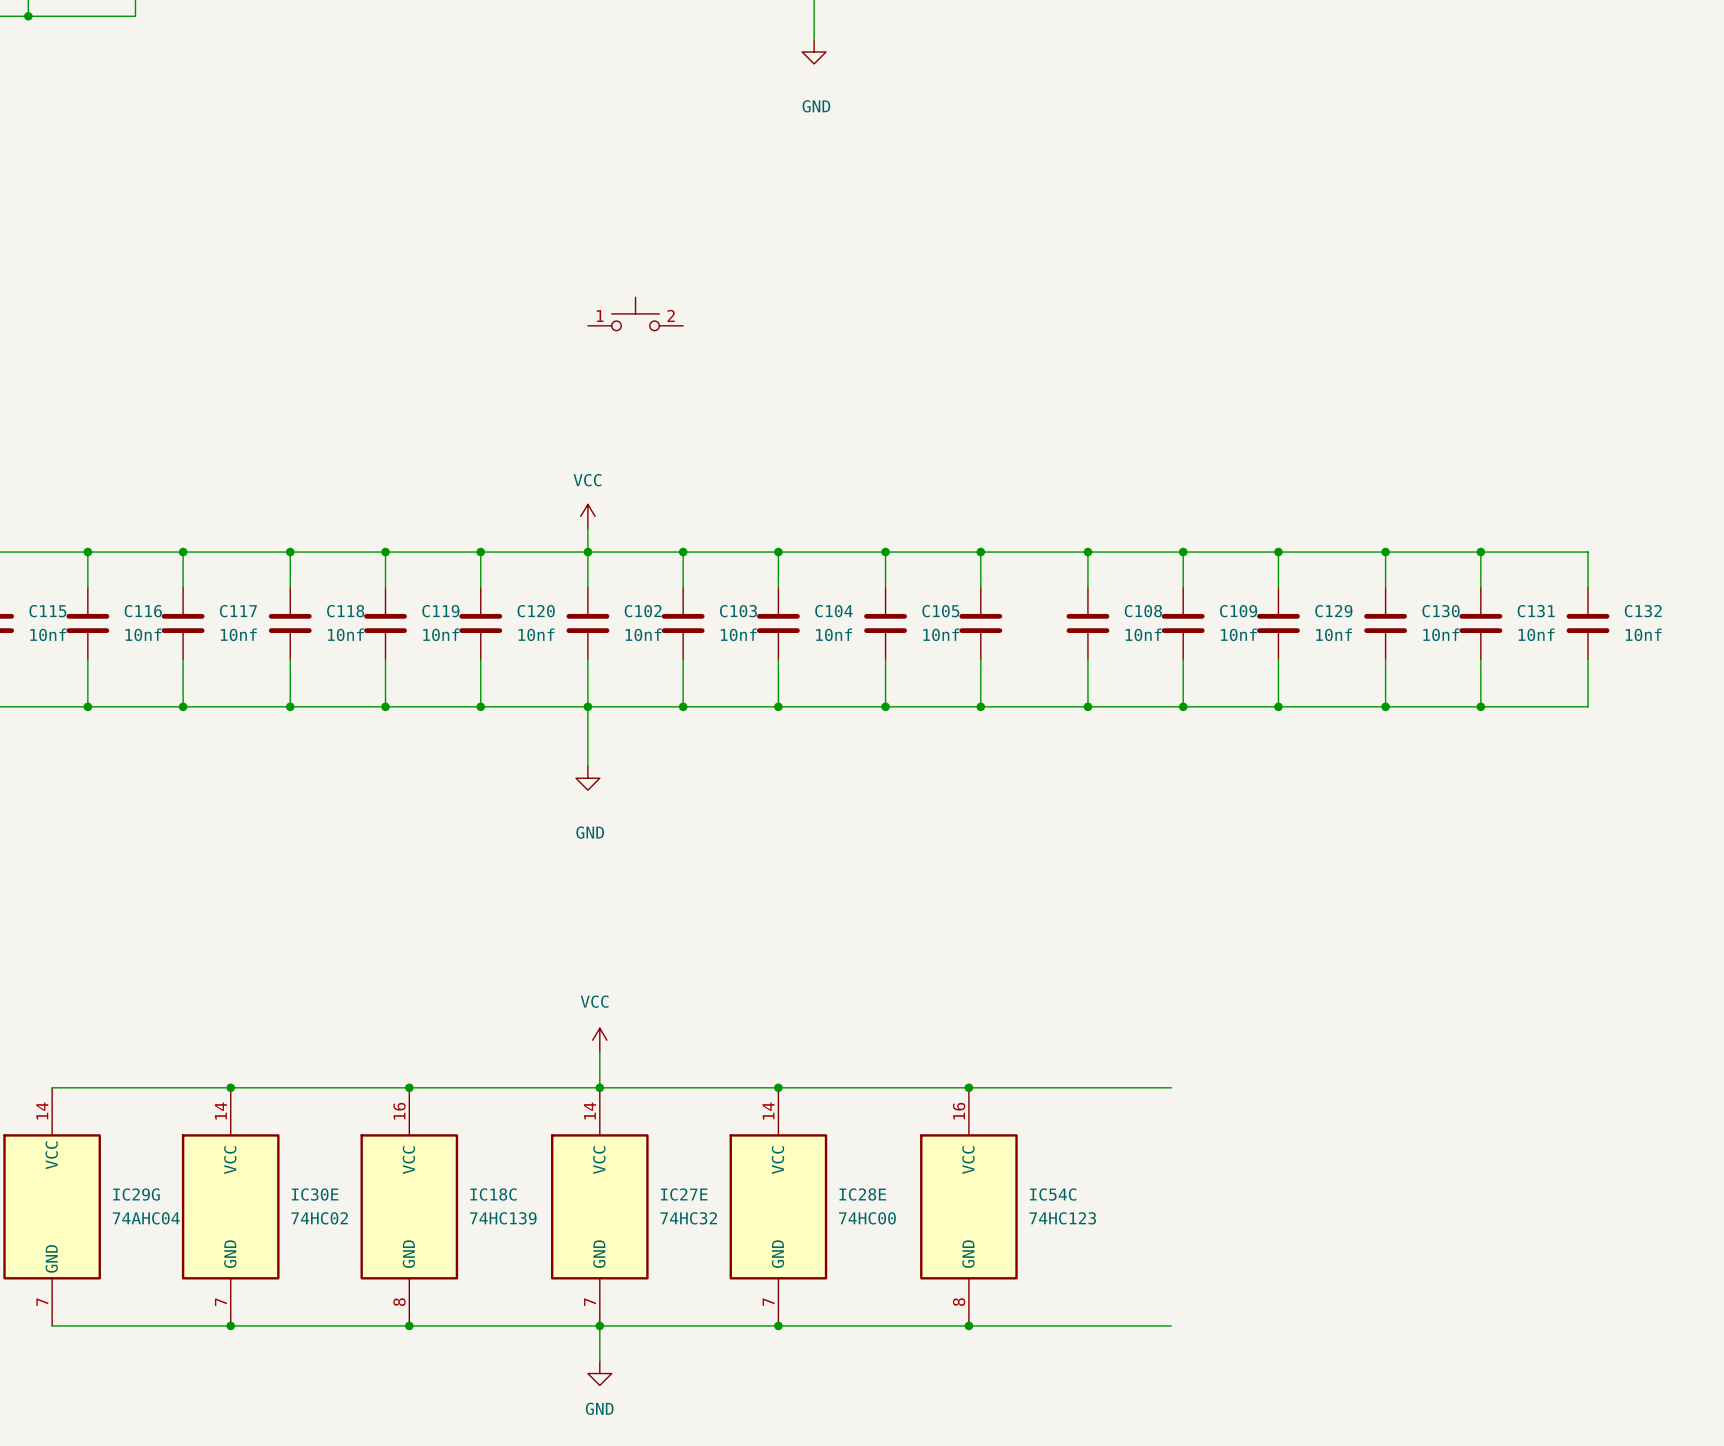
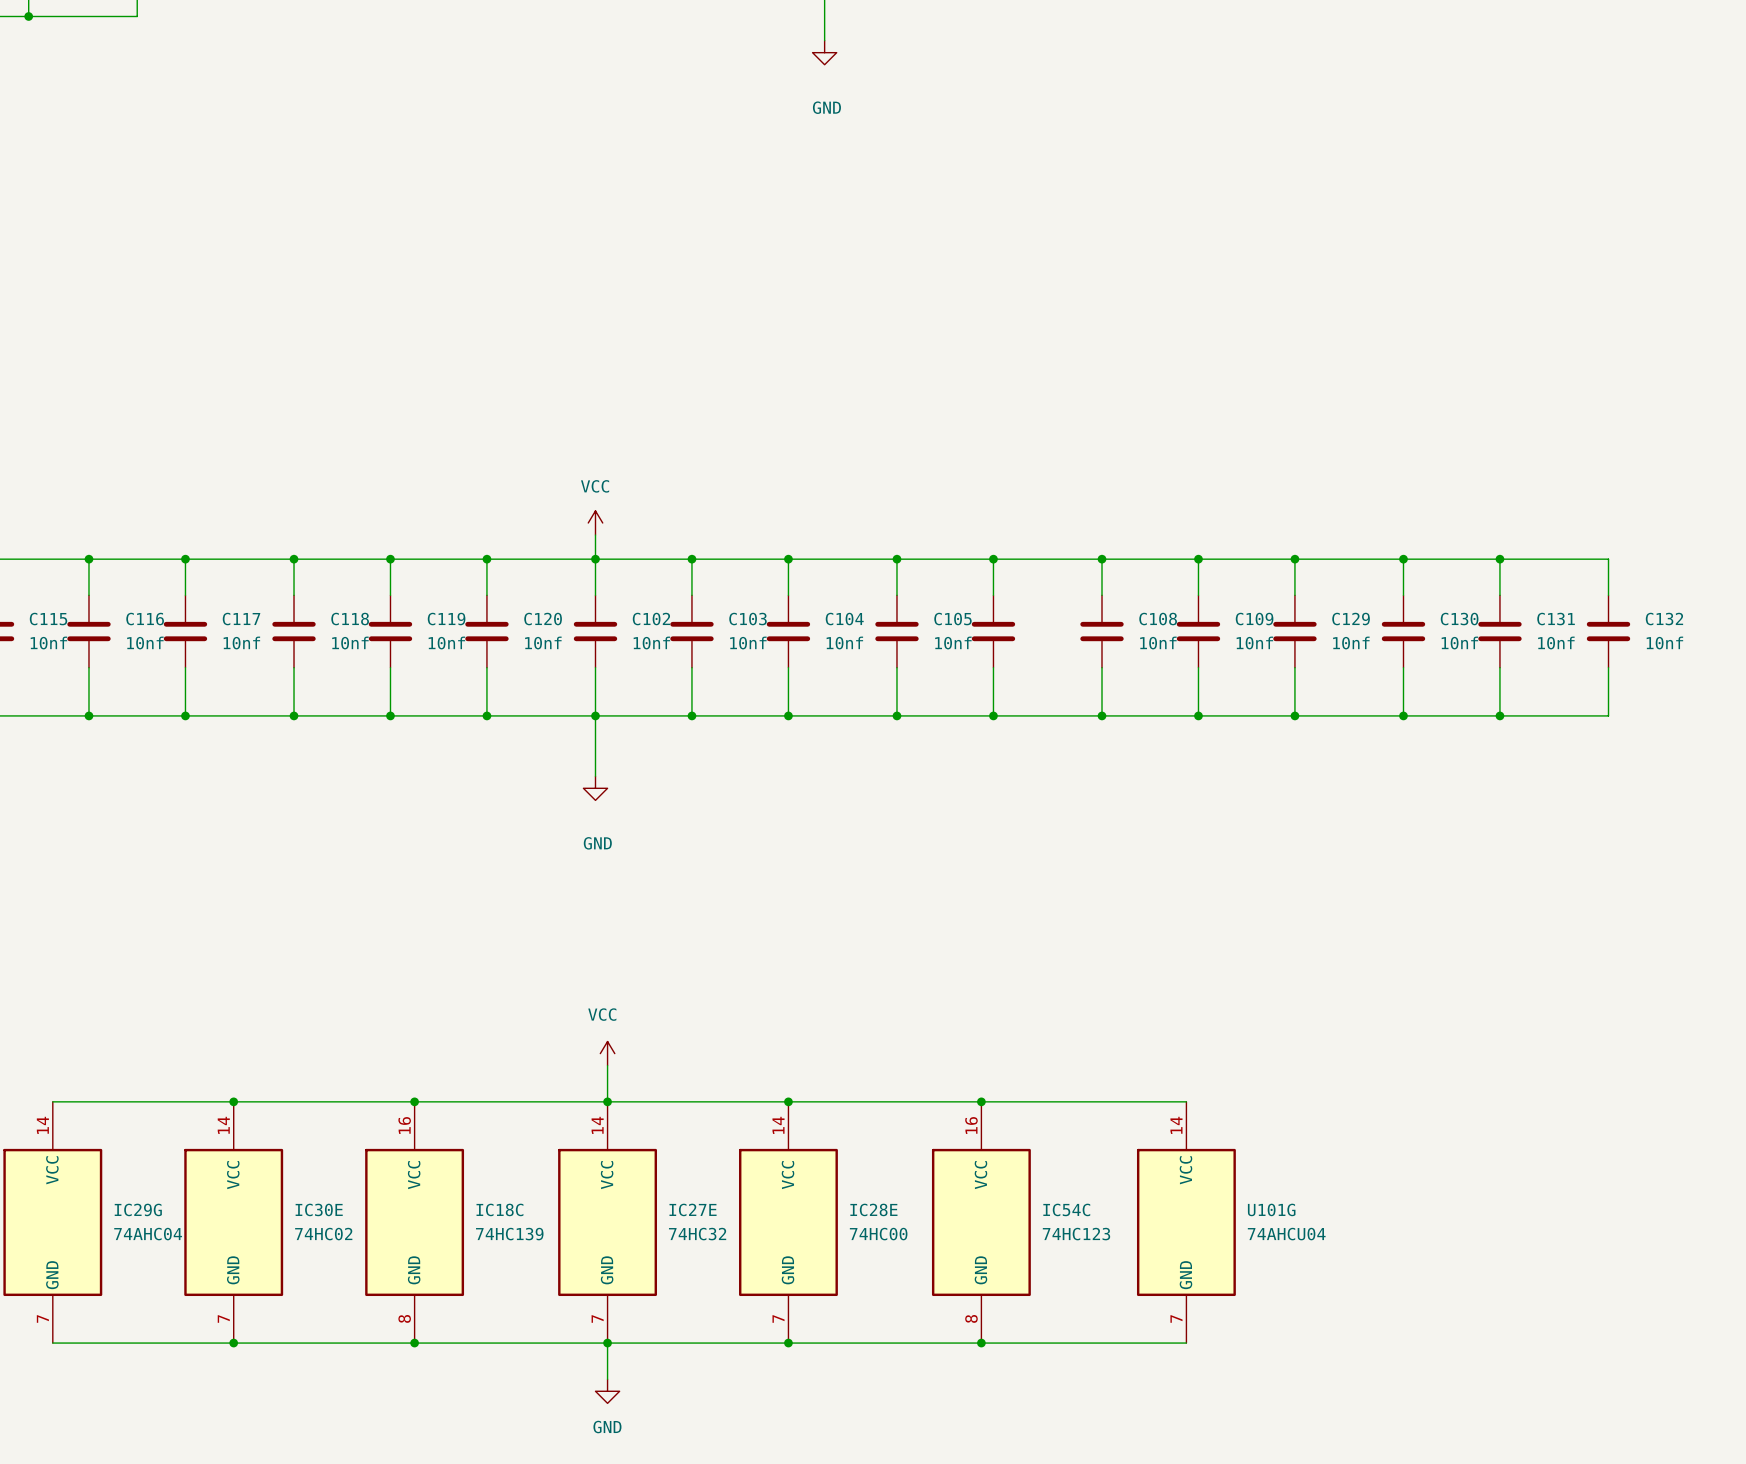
part: (635, 313) -> none
U101G: none -> 74AHCU04 (1186, 1222)

